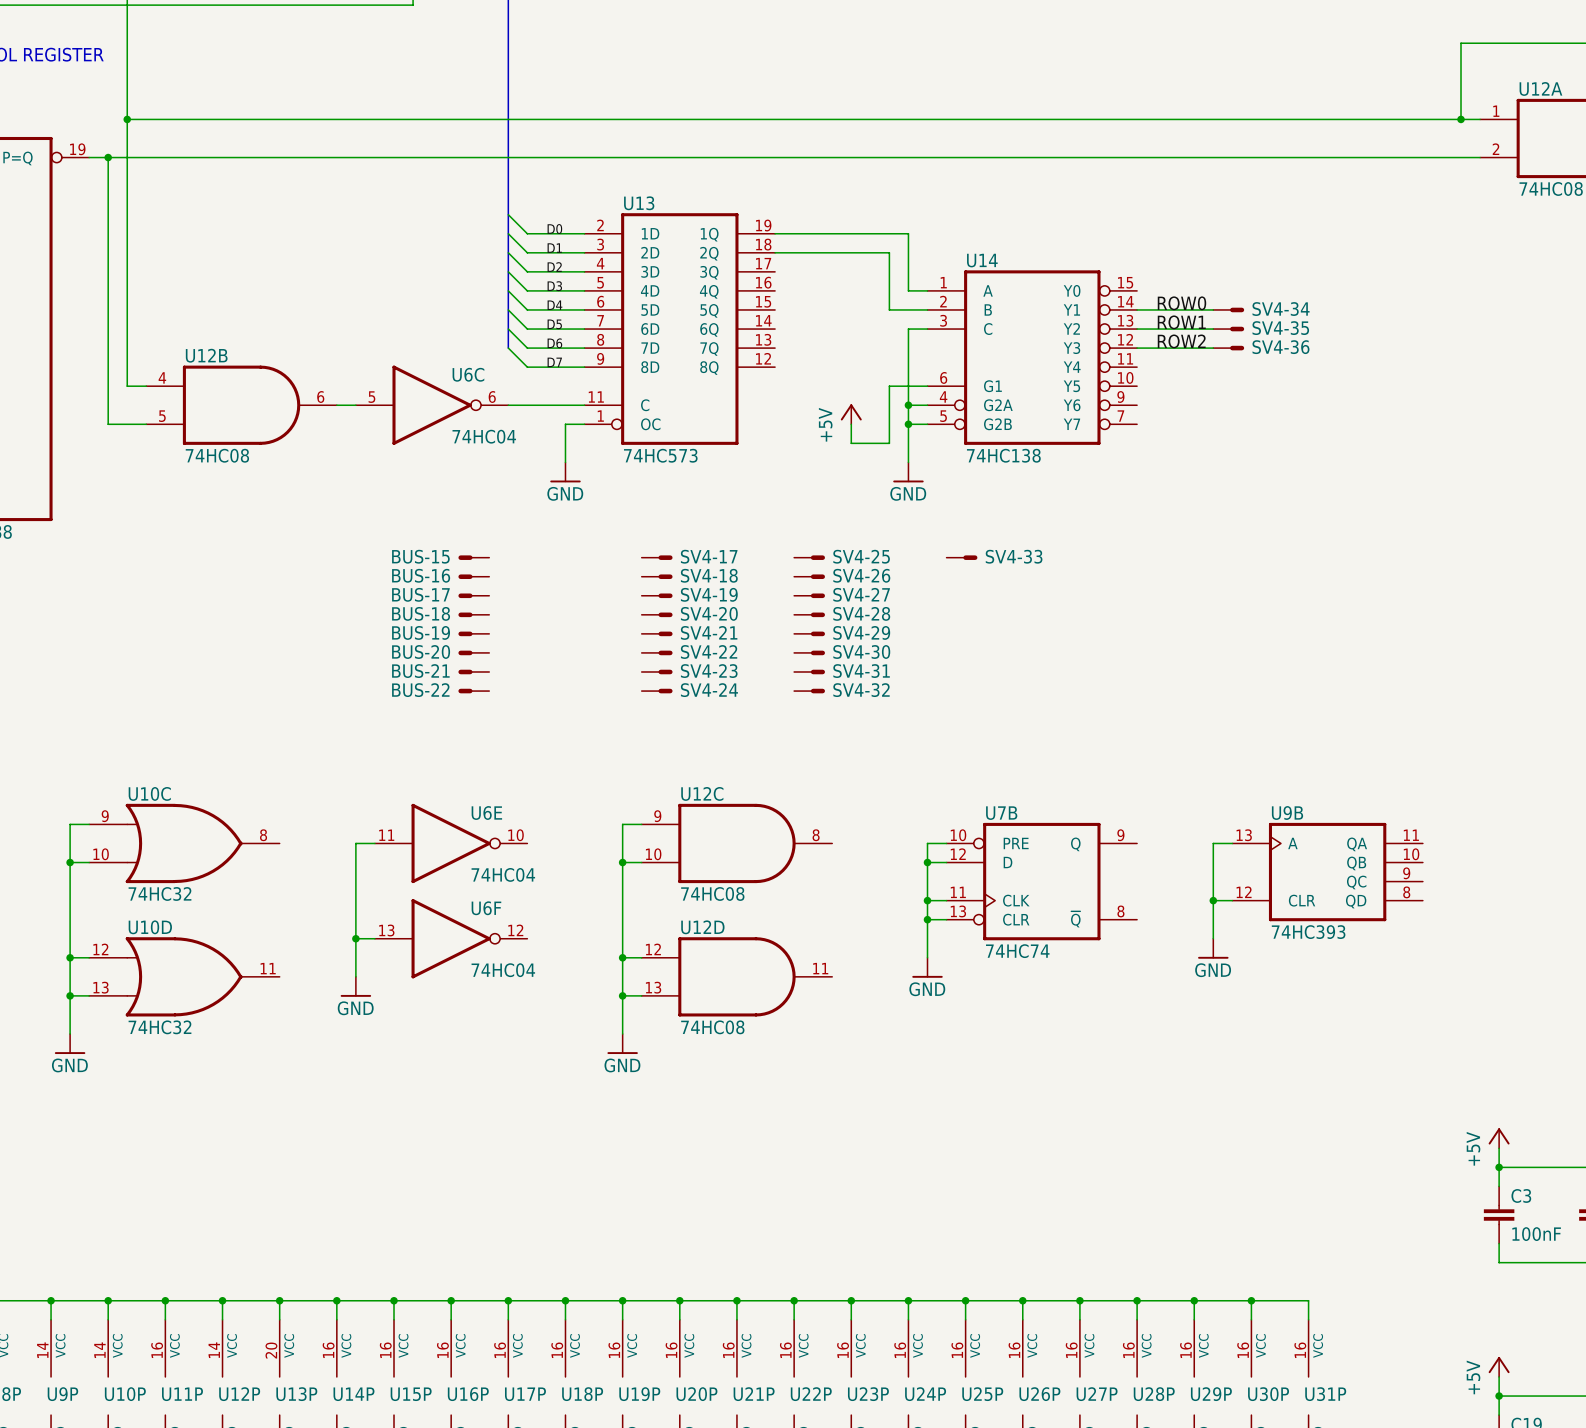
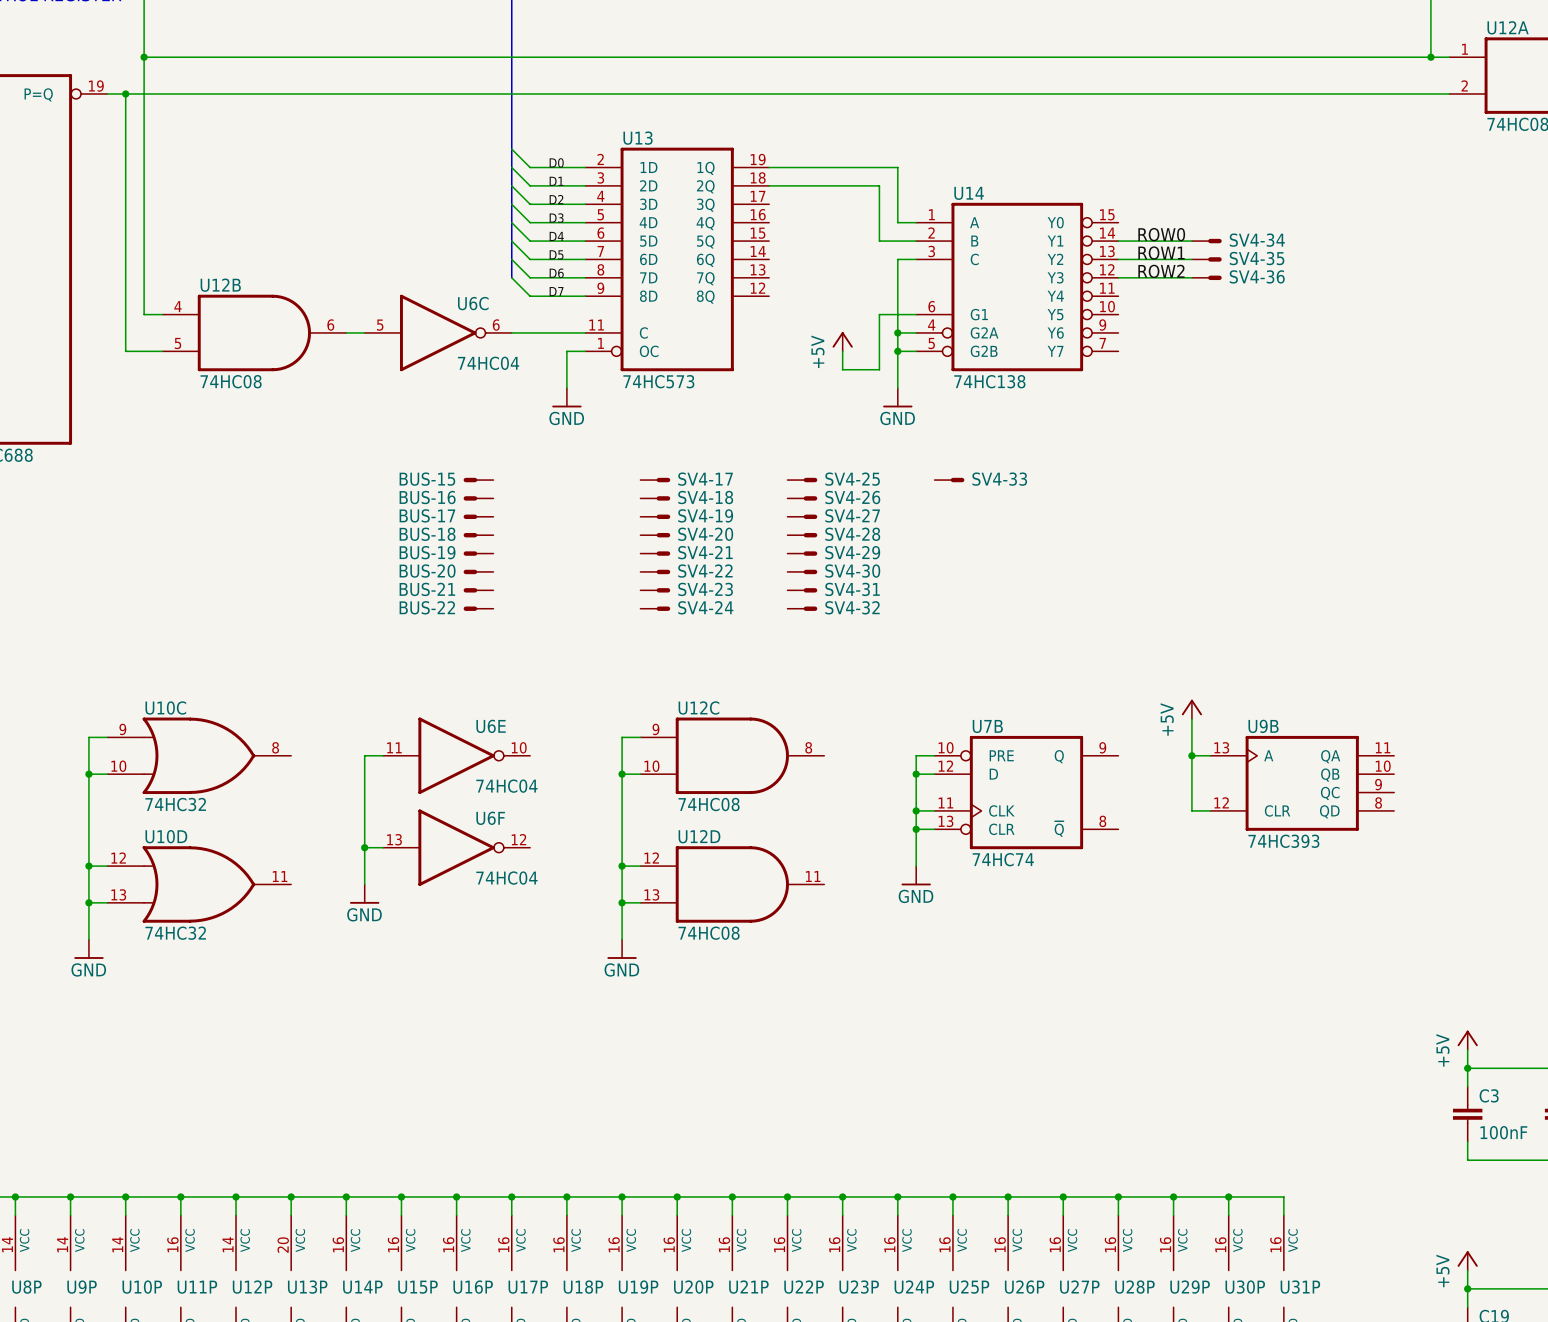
power symbol: none -> +5V (1191, 709)
junction: none -> (1191, 755)
wire: (1213, 900) (1213, 938) -> (1191, 719) (1191, 755)
junction: (1213, 900) -> none
power symbol: GND (1213, 948) -> none

